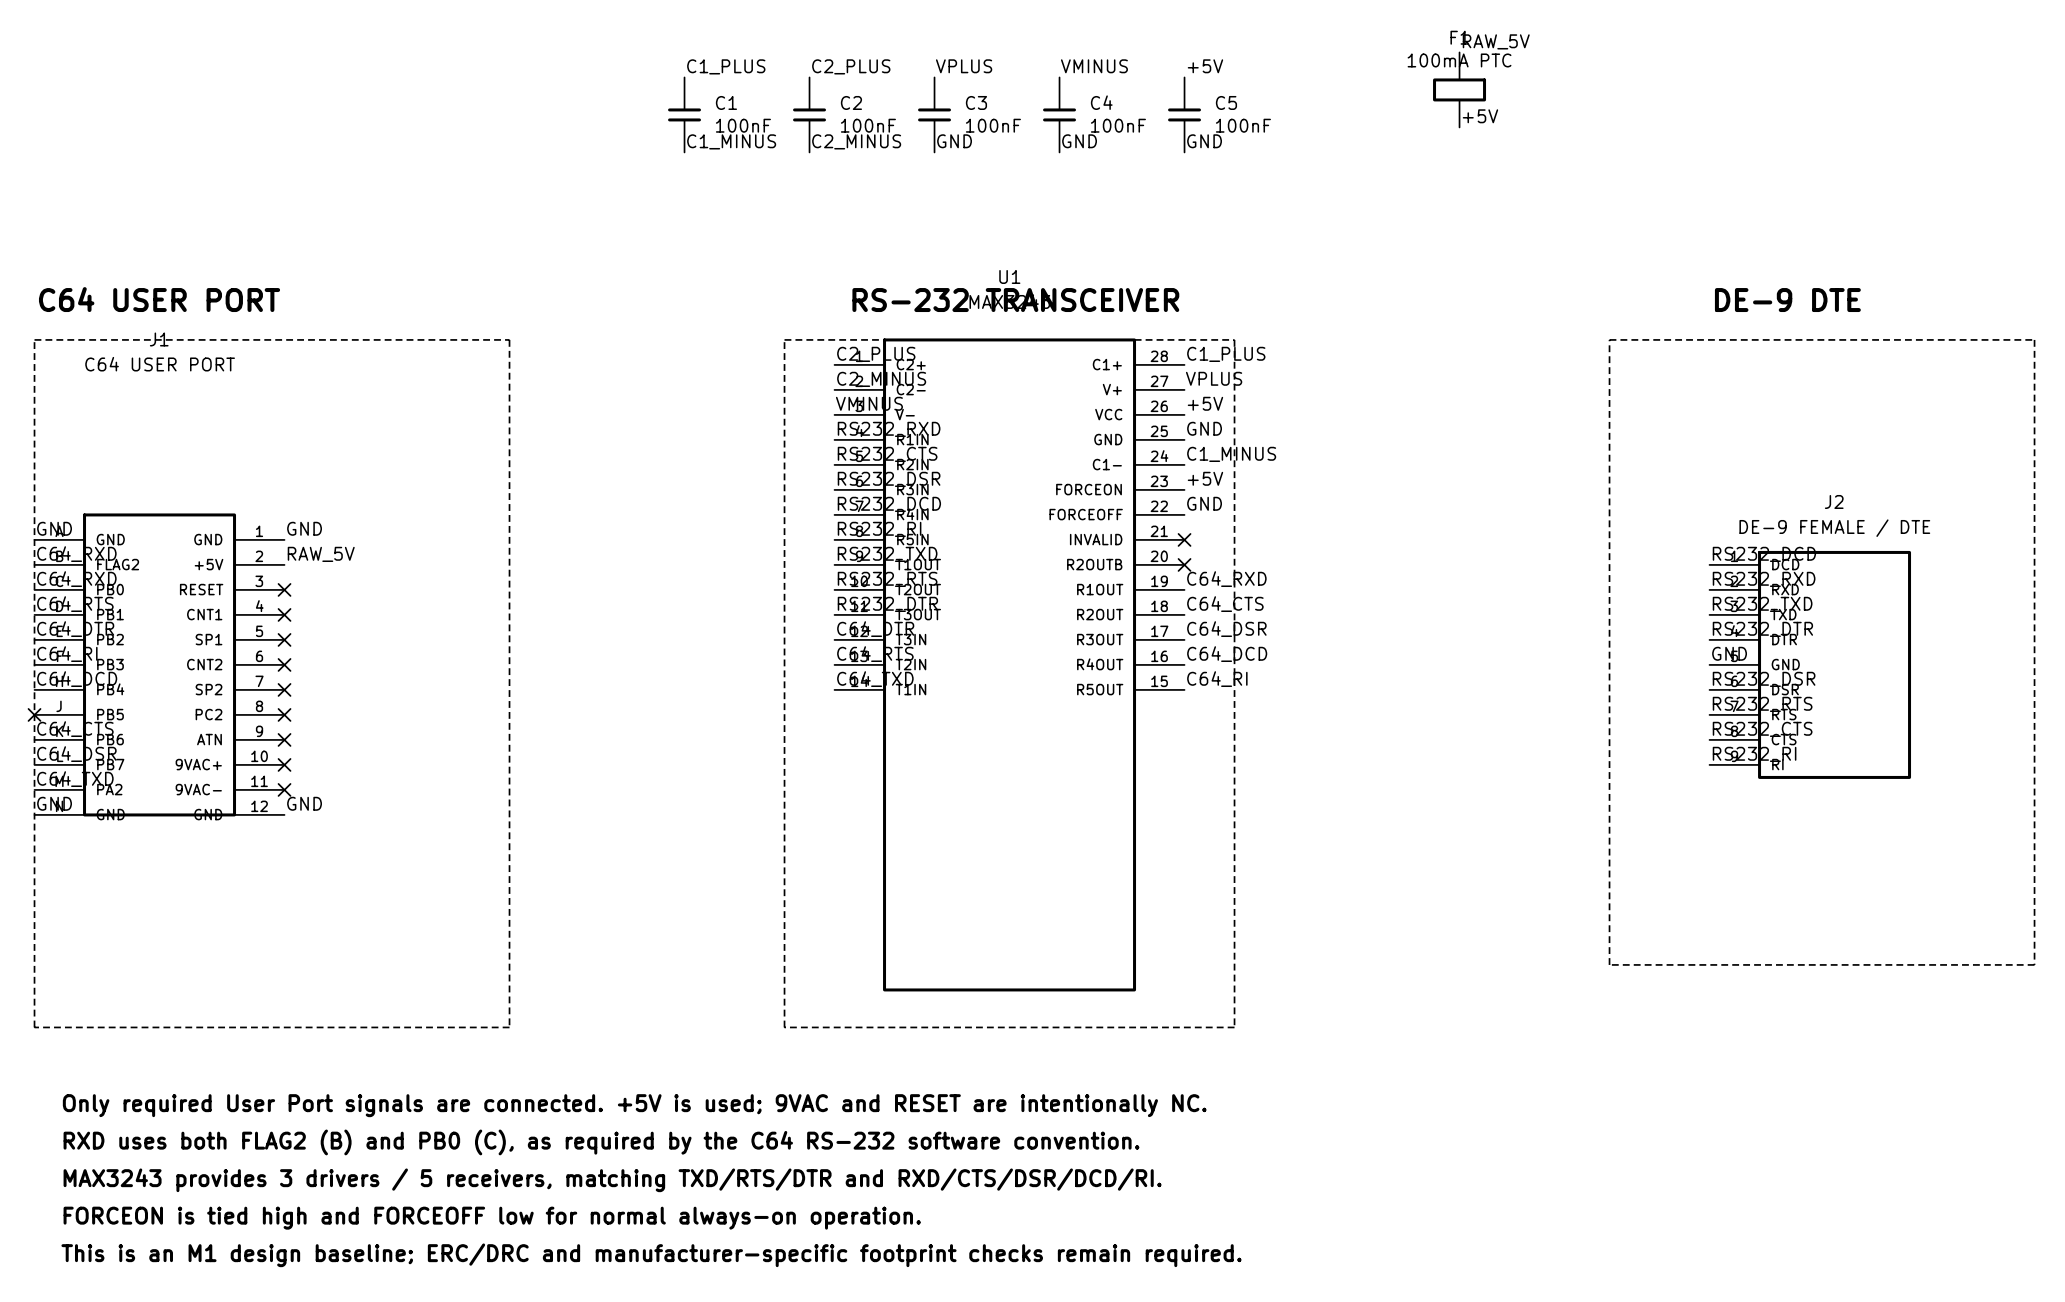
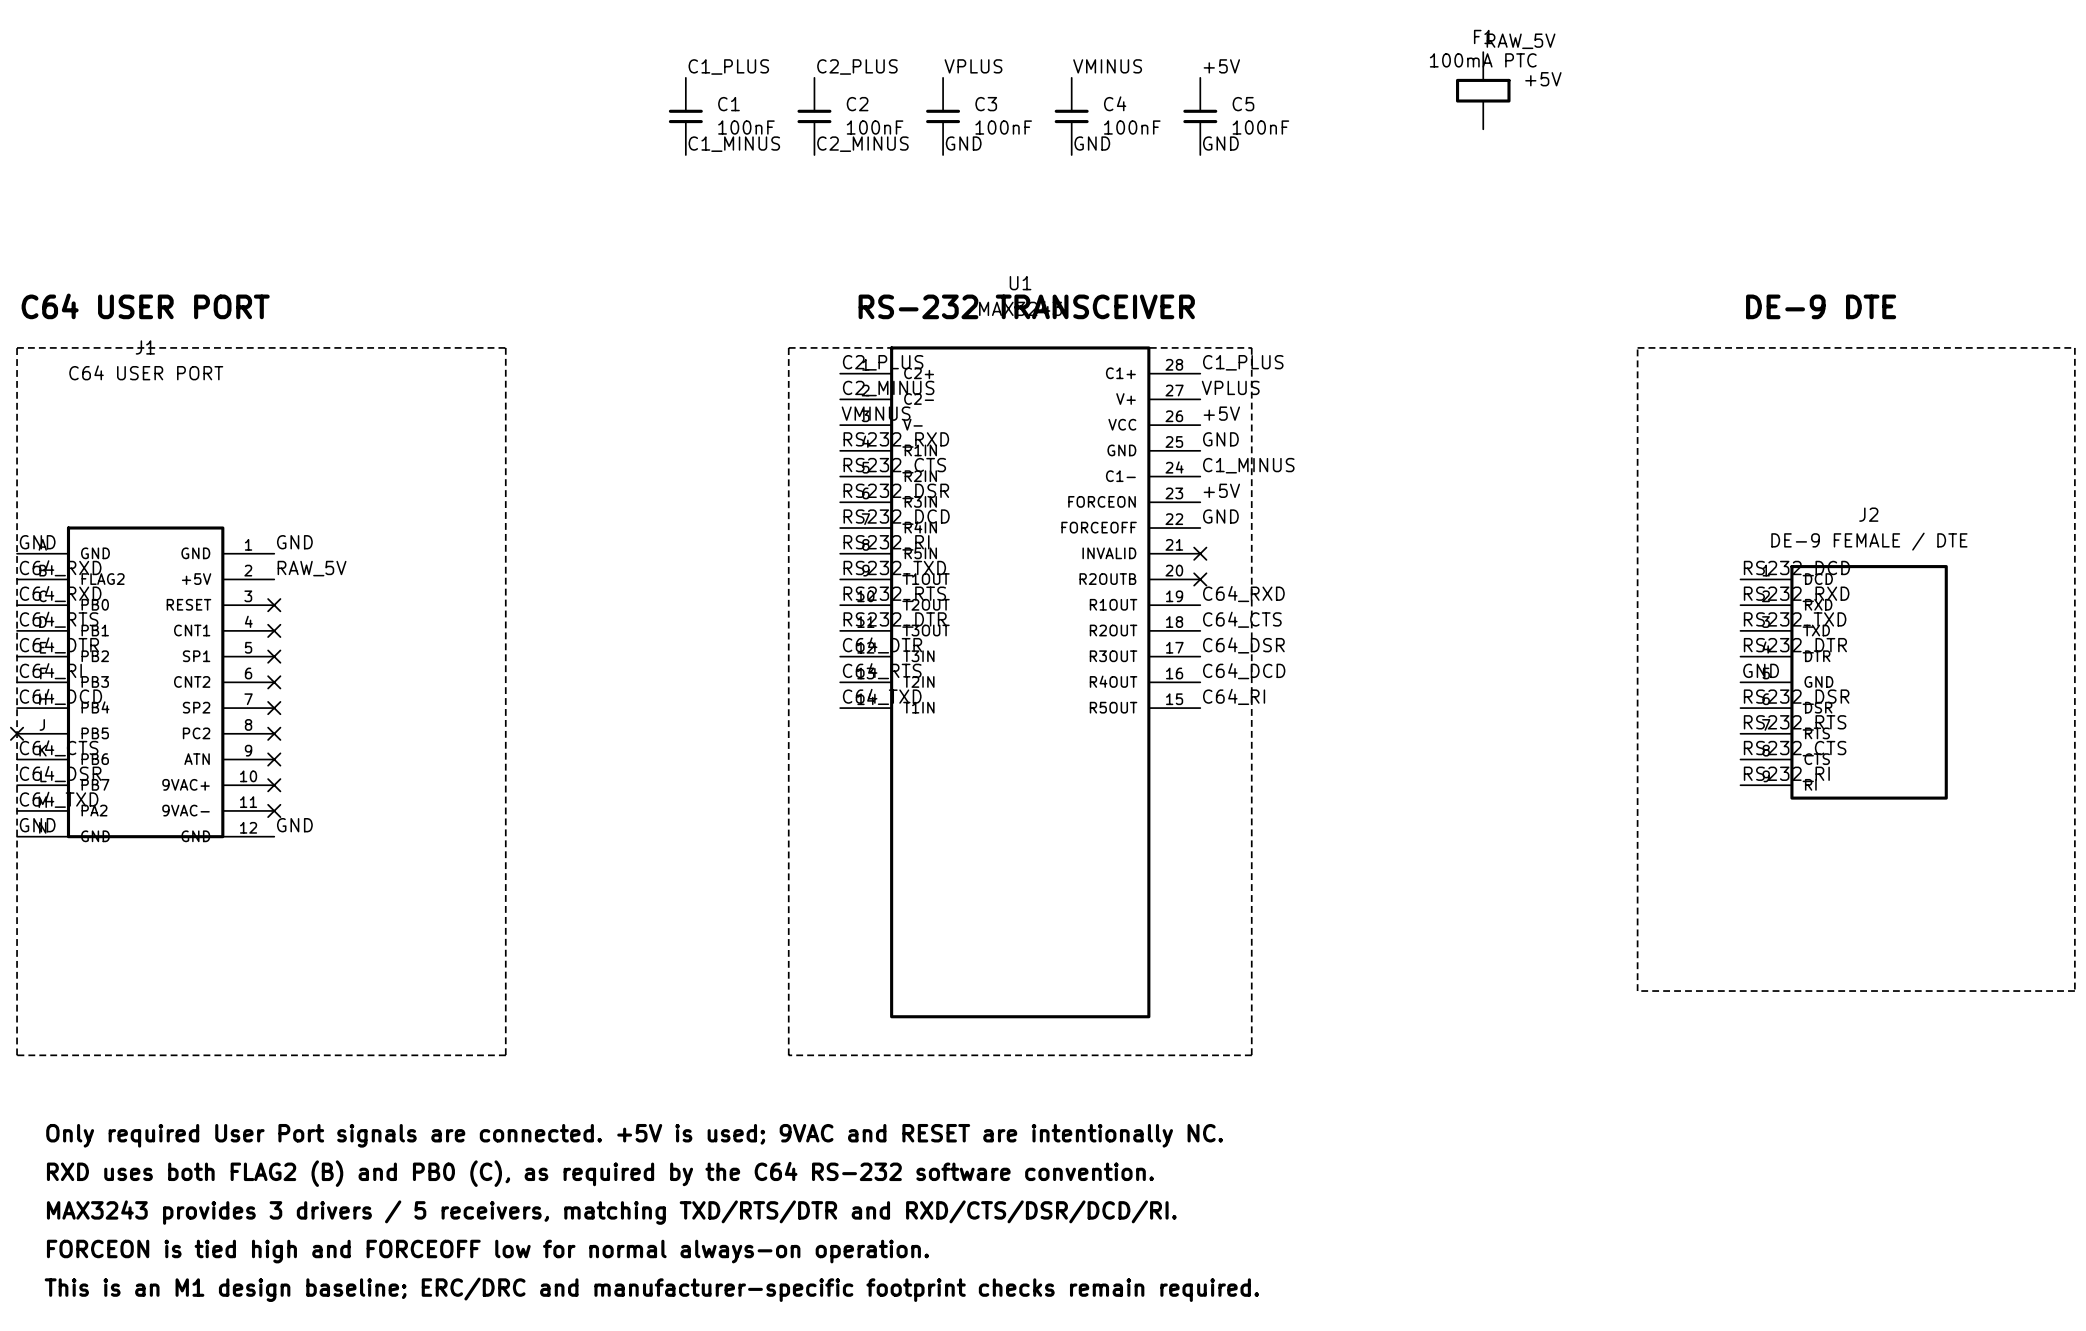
label position: +5V (1480, 116) -> +5V (1543, 79)

